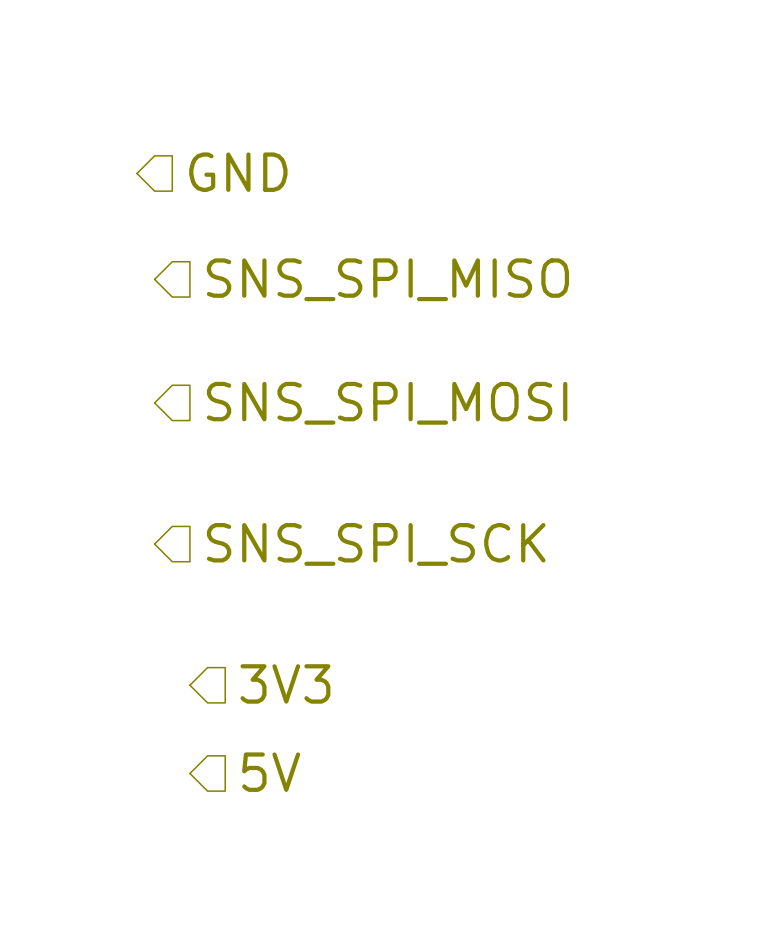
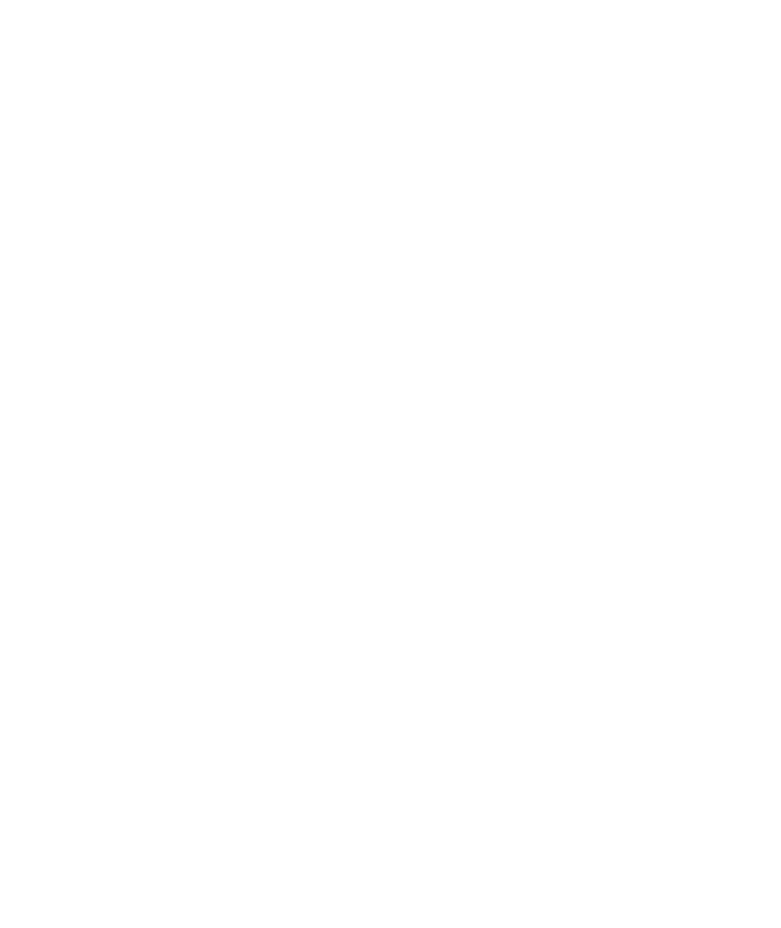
hierarchical label: GND (238, 172) -> none
hierarchical label: SNS_SPI_MISO (387, 279) -> none
hierarchical label: SNS_SPI_MOSI (387, 403) -> none
hierarchical label: SNS_SPI_SCK (376, 544) -> none
hierarchical label: 3V3 (285, 683) -> none
hierarchical label: 5V (271, 772) -> none

